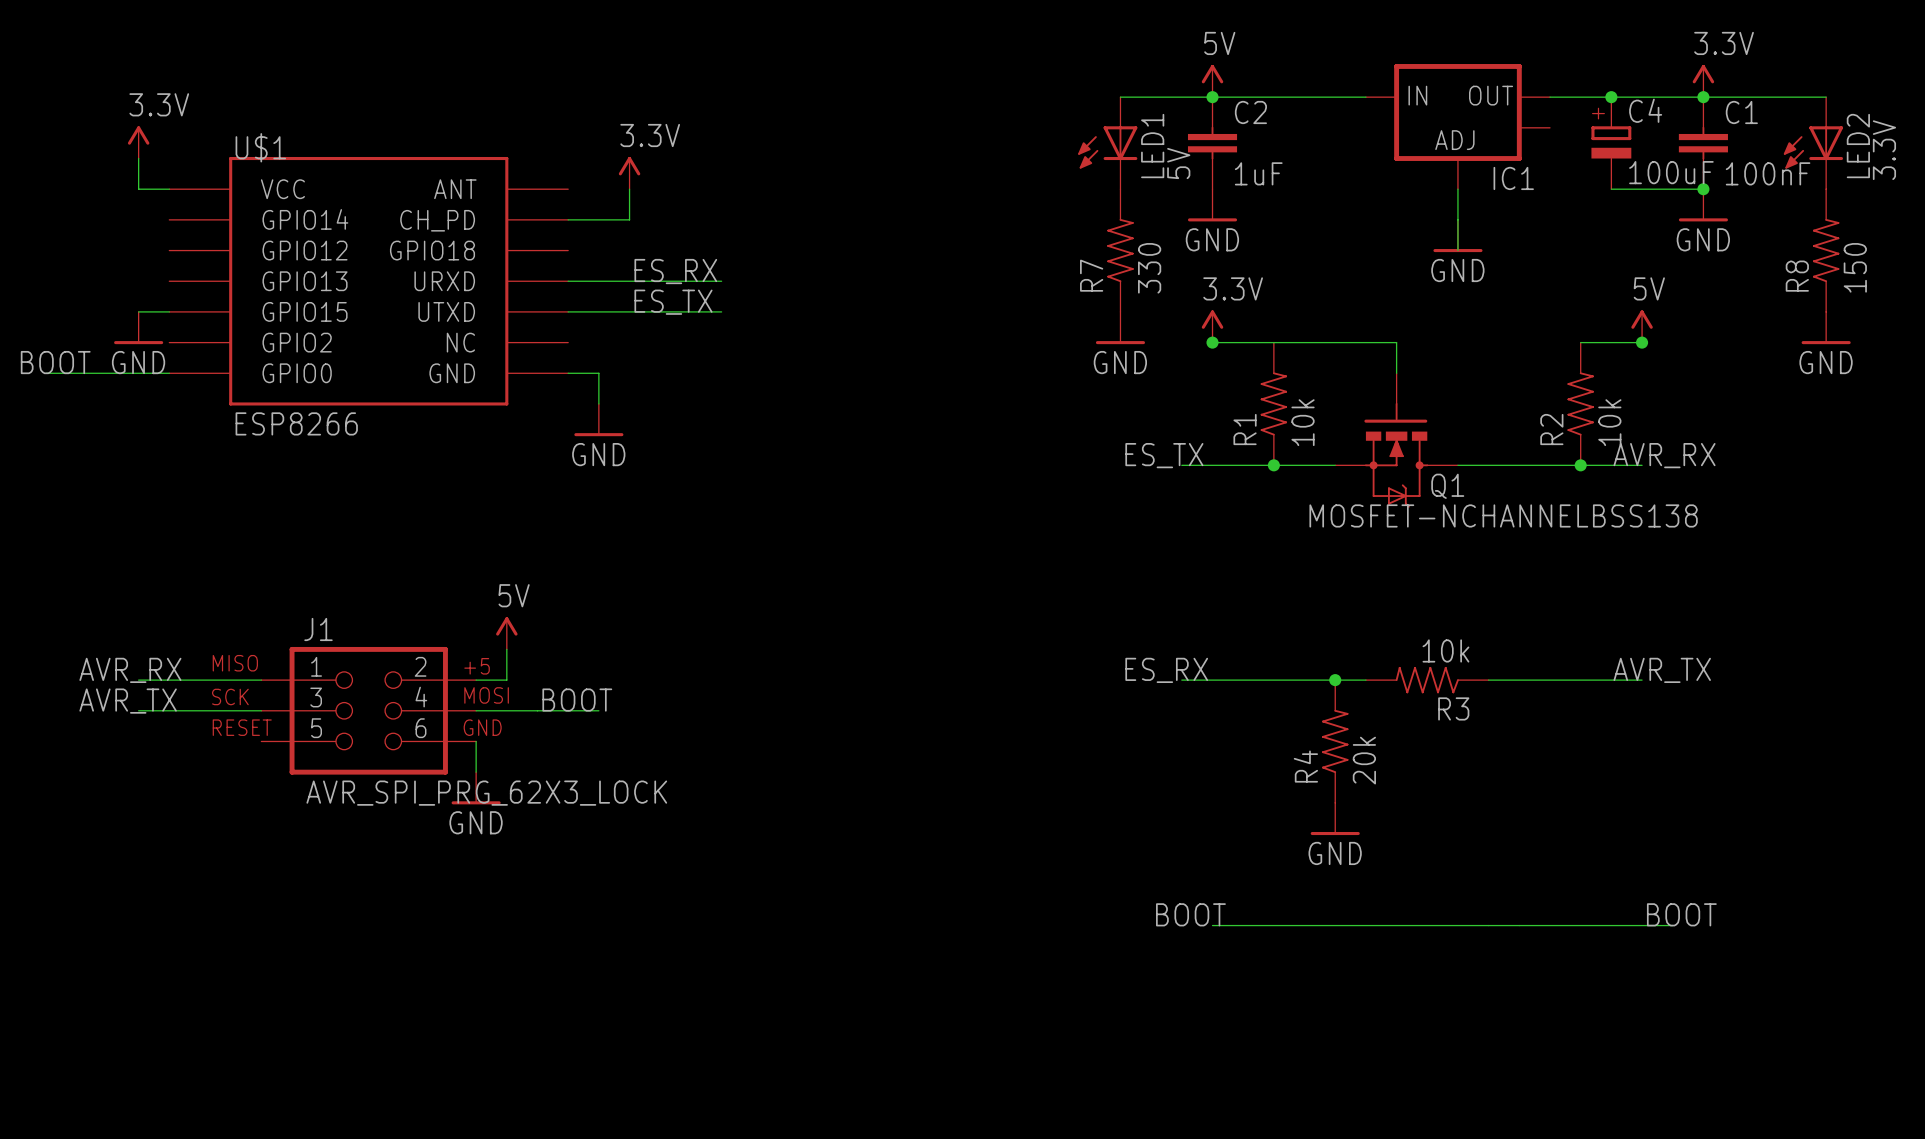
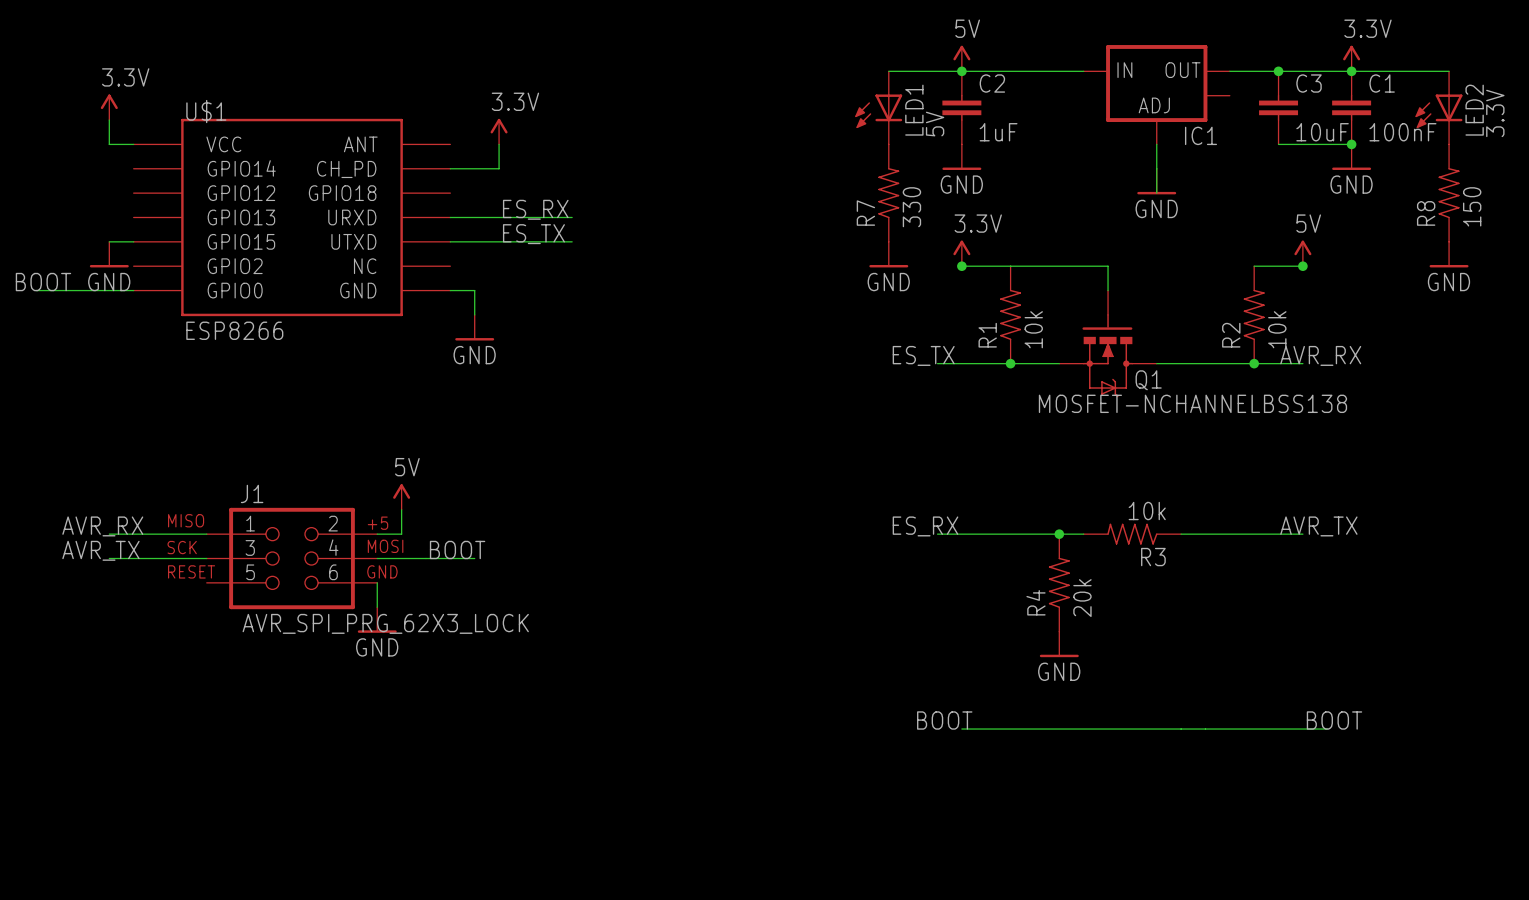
C4: 100uF (1611, 143) -> none
C3: none -> 10uF (1278, 107)

